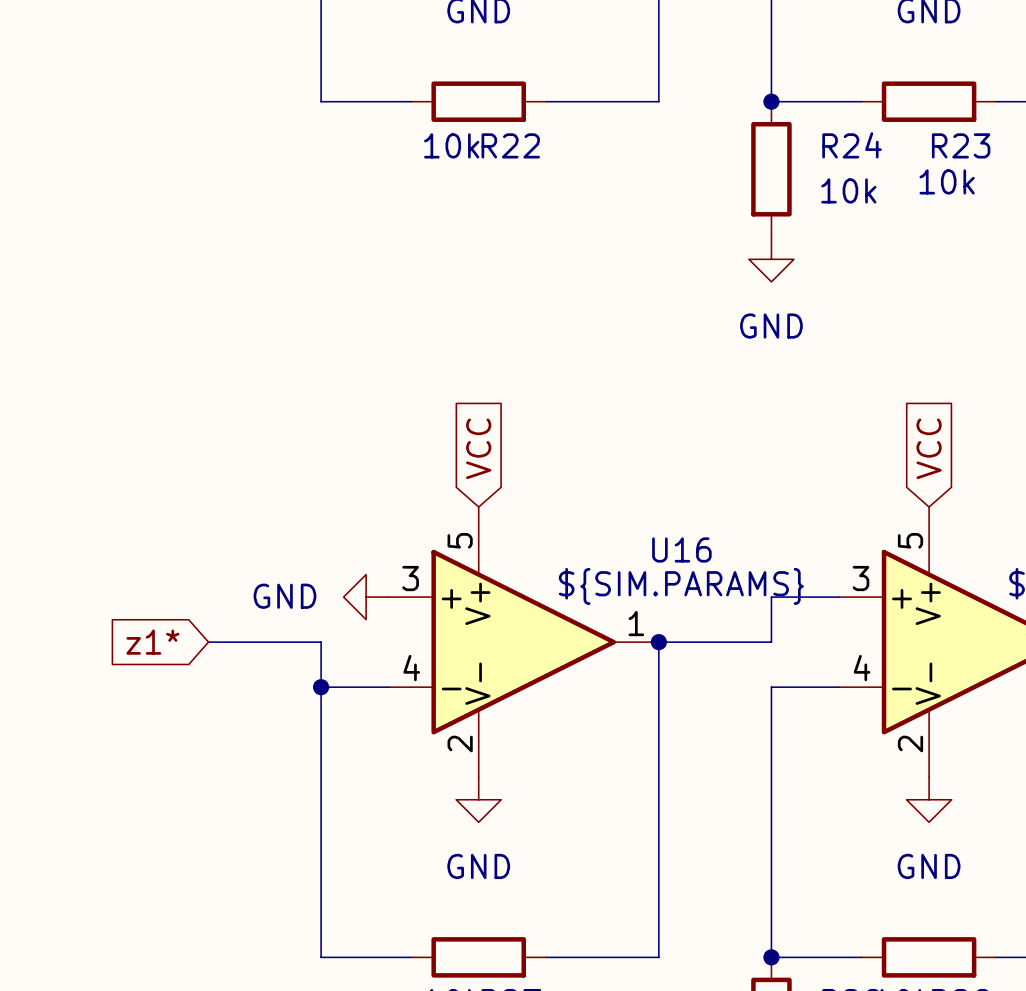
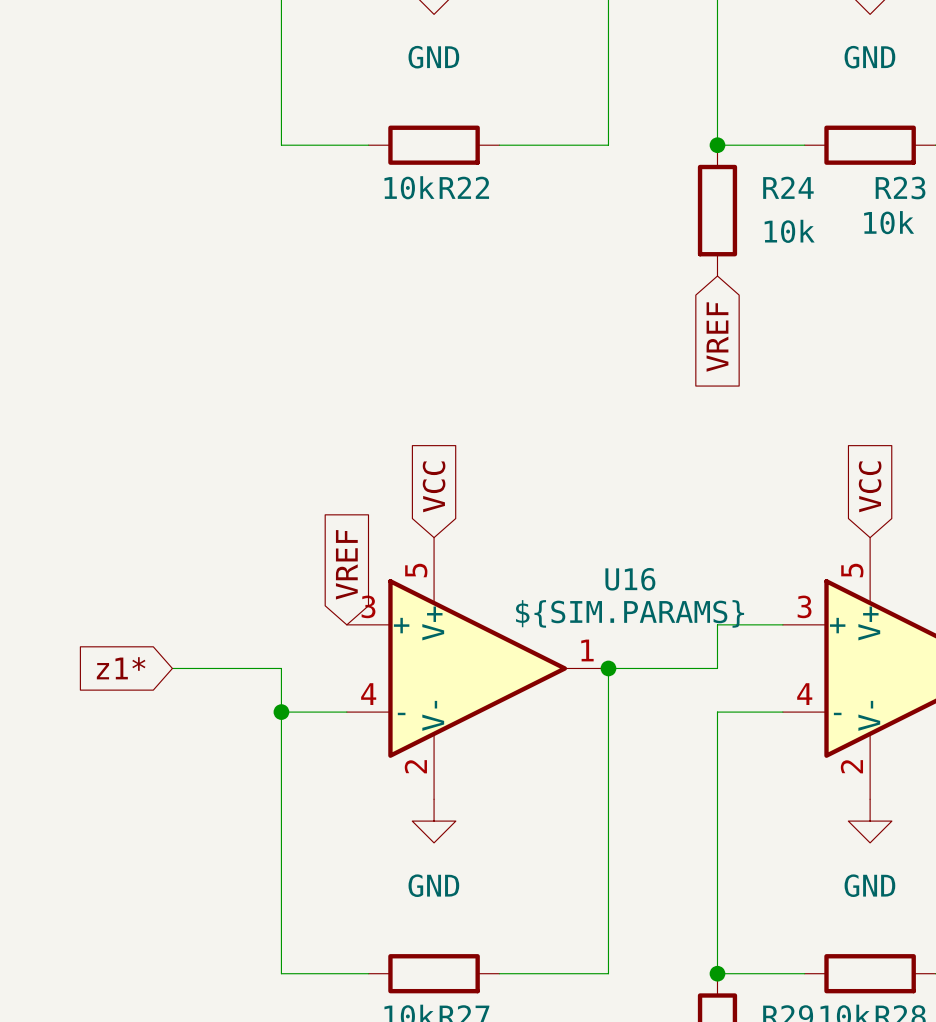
power symbol: GND (771, 259) -> none
global label: none -> VREF (717, 337)
global label: none -> VREF (346, 564)
power symbol: GND (366, 597) -> none

